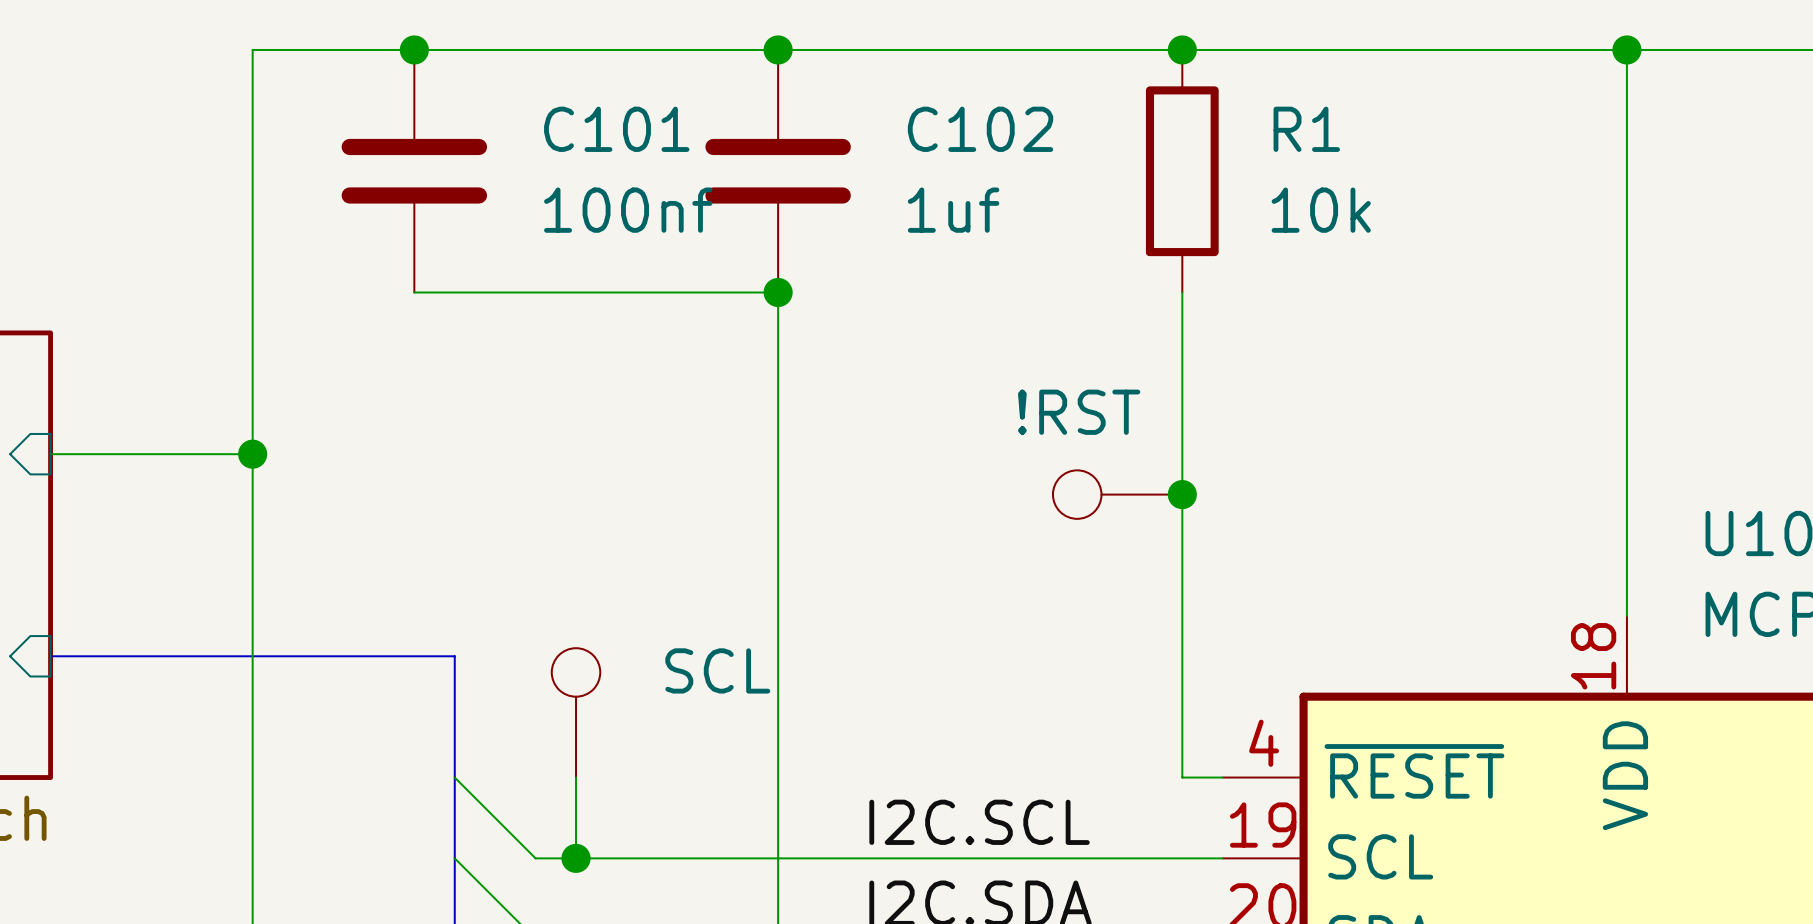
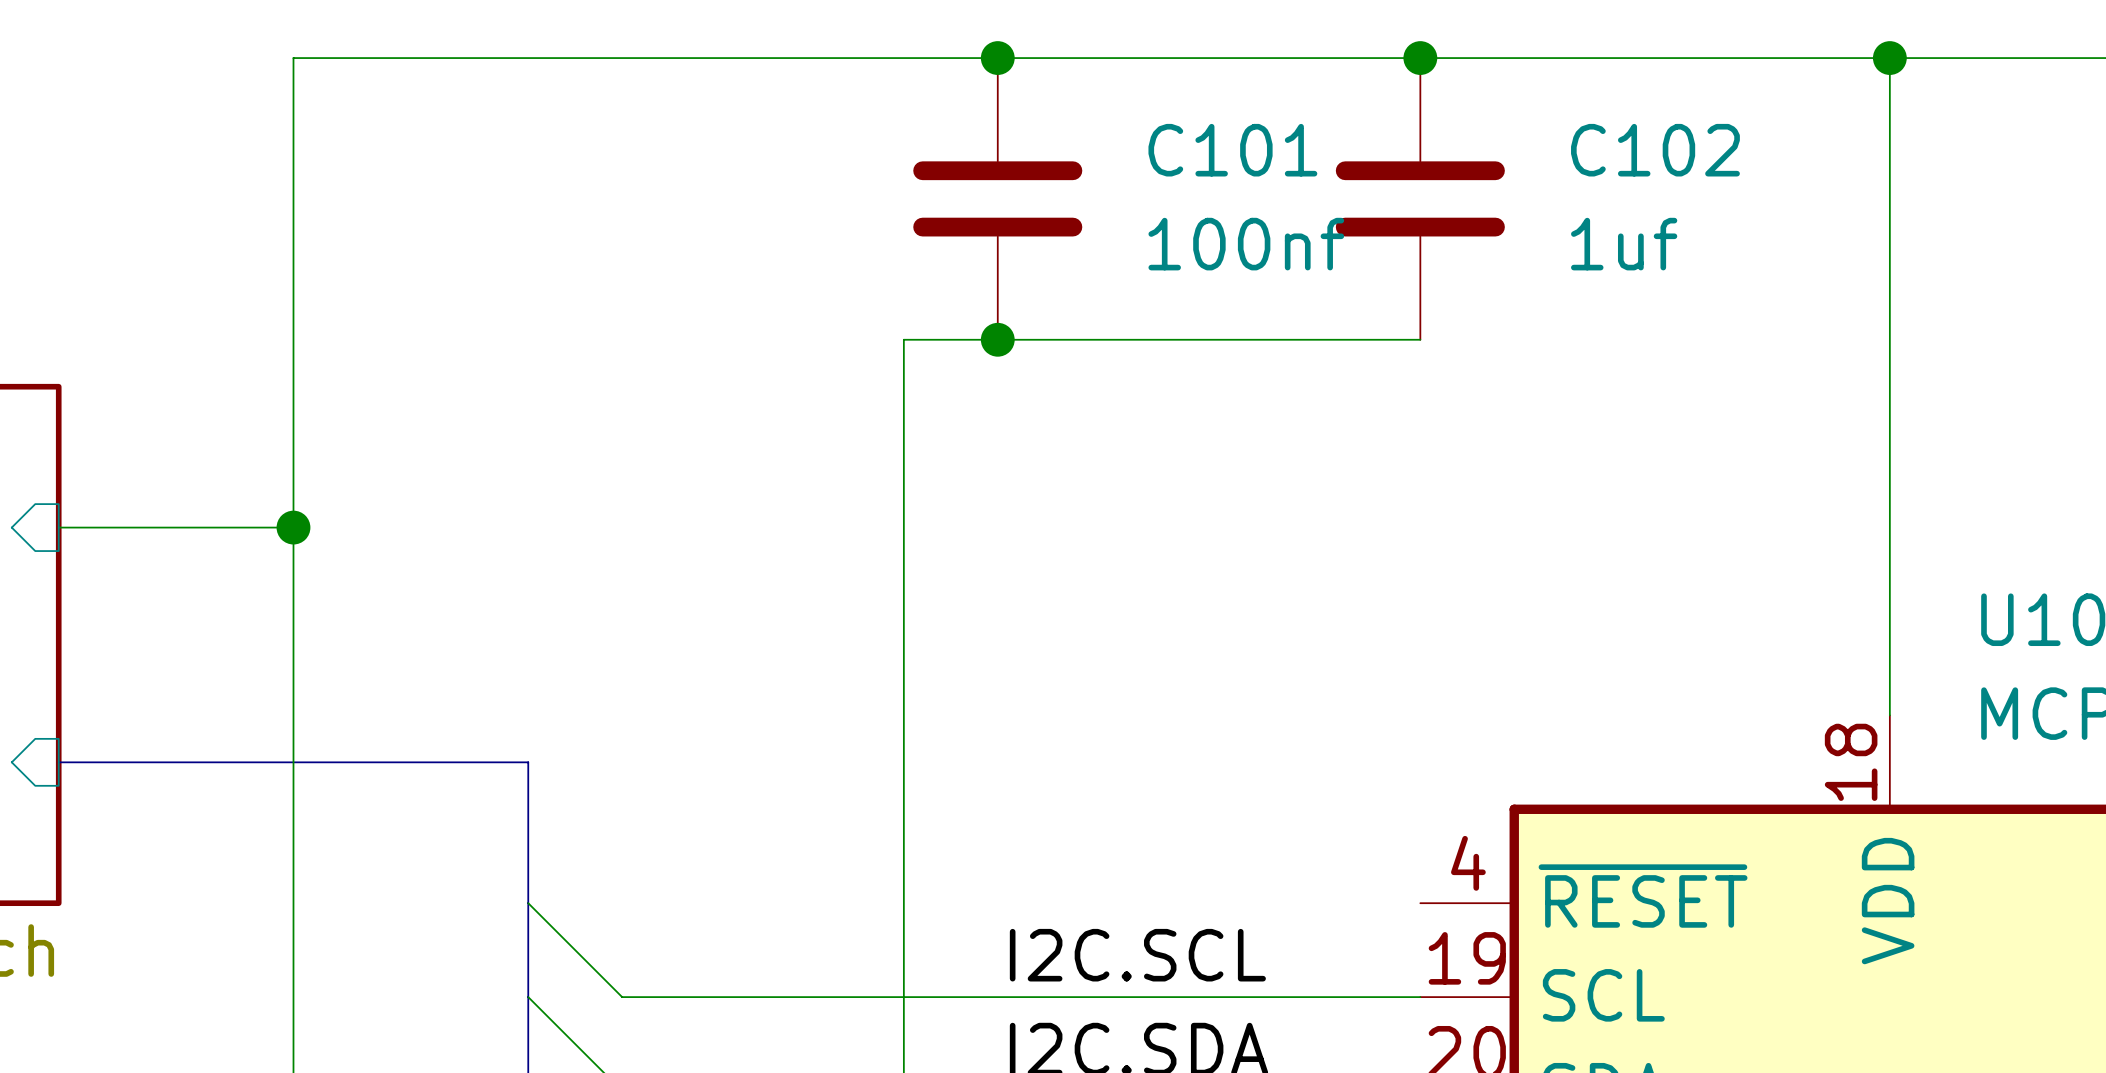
junction: (414, 49) -> none
junction position: (778, 49) -> (997, 58)
junction position: (1182, 49) -> (1420, 58)
C101 position: (414, 171) -> (997, 198)
C102 position: (778, 171) -> (1420, 198)
R1: 10k (1182, 171) -> none
wire: (414, 292) (778, 292) -> (1420, 339) (903, 339)
junction position: (778, 292) -> (997, 339)
wire: (1182, 292) (1182, 777) (1222, 777) -> none
part: (1117, 494) -> none
junction: (1182, 494) -> none
part: (576, 712) -> none
wire: (576, 777) (576, 858) -> none
junction: (576, 858) -> none

